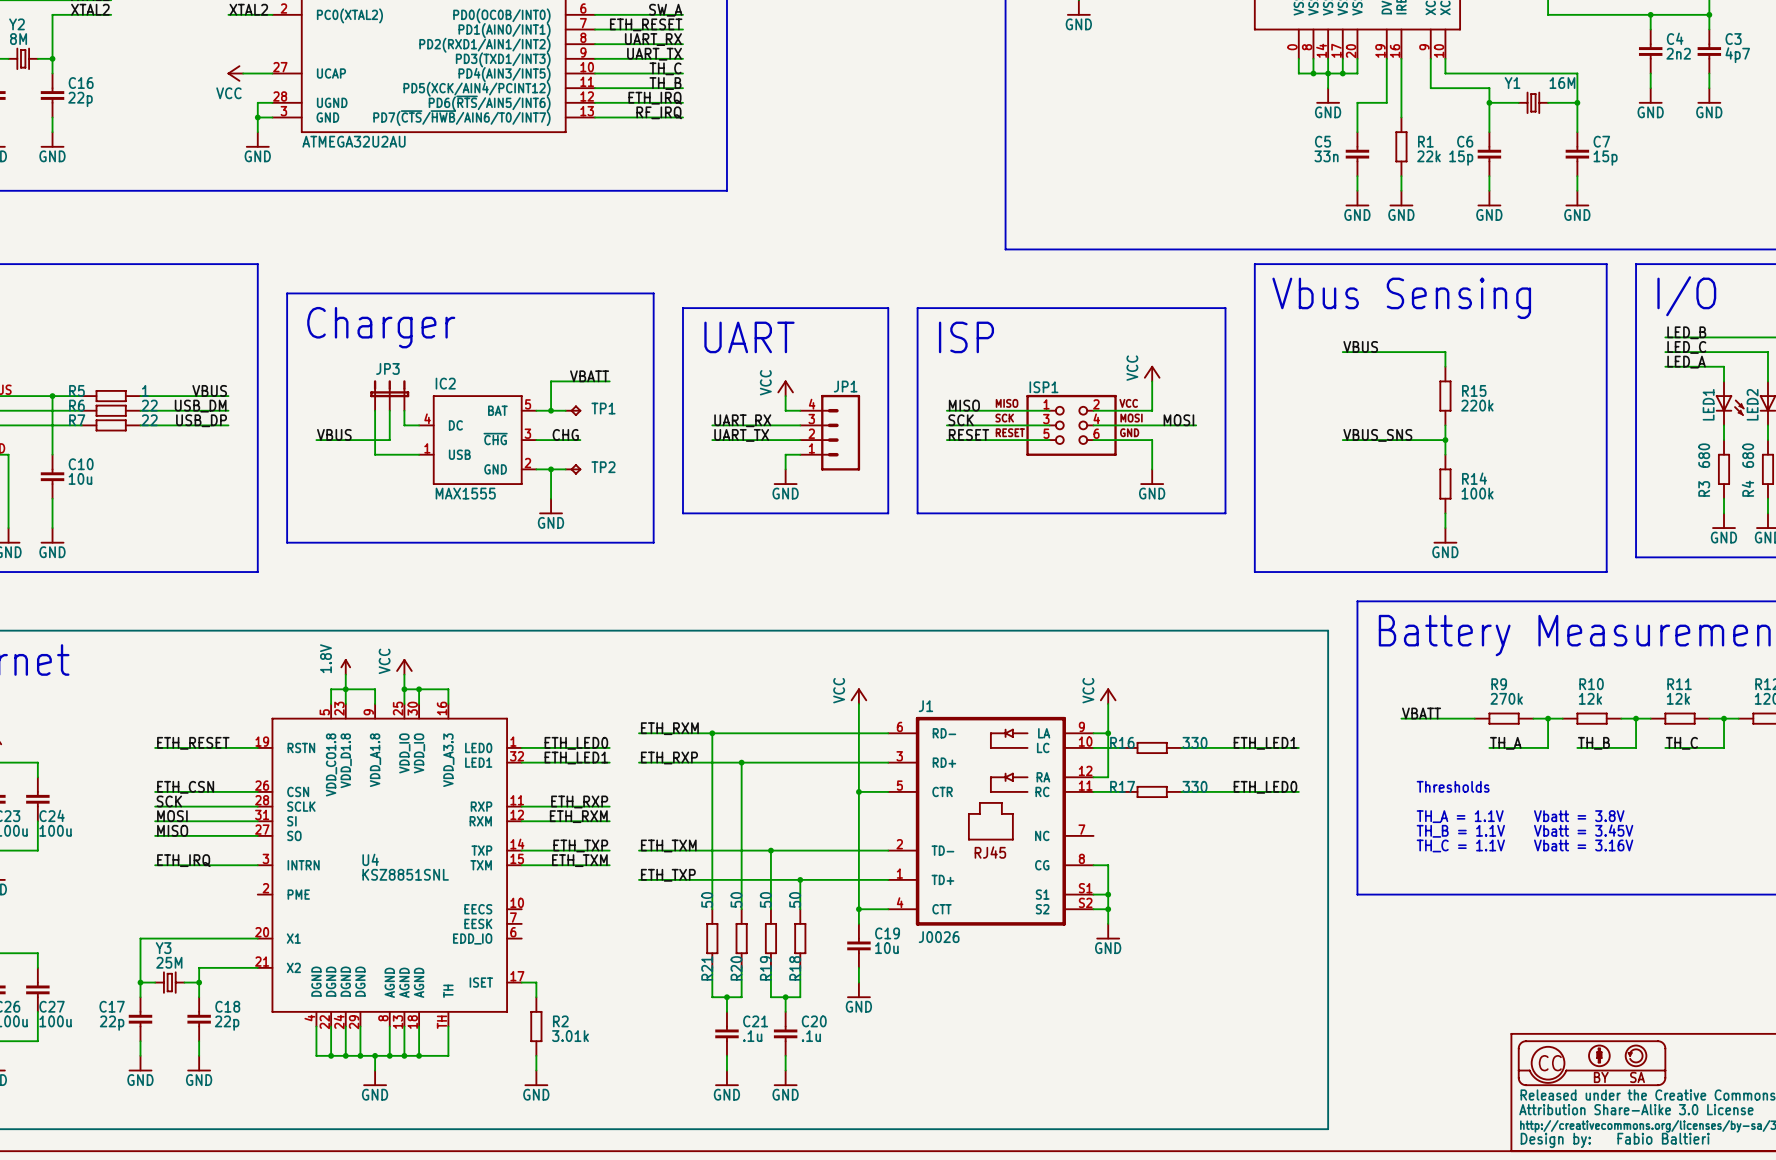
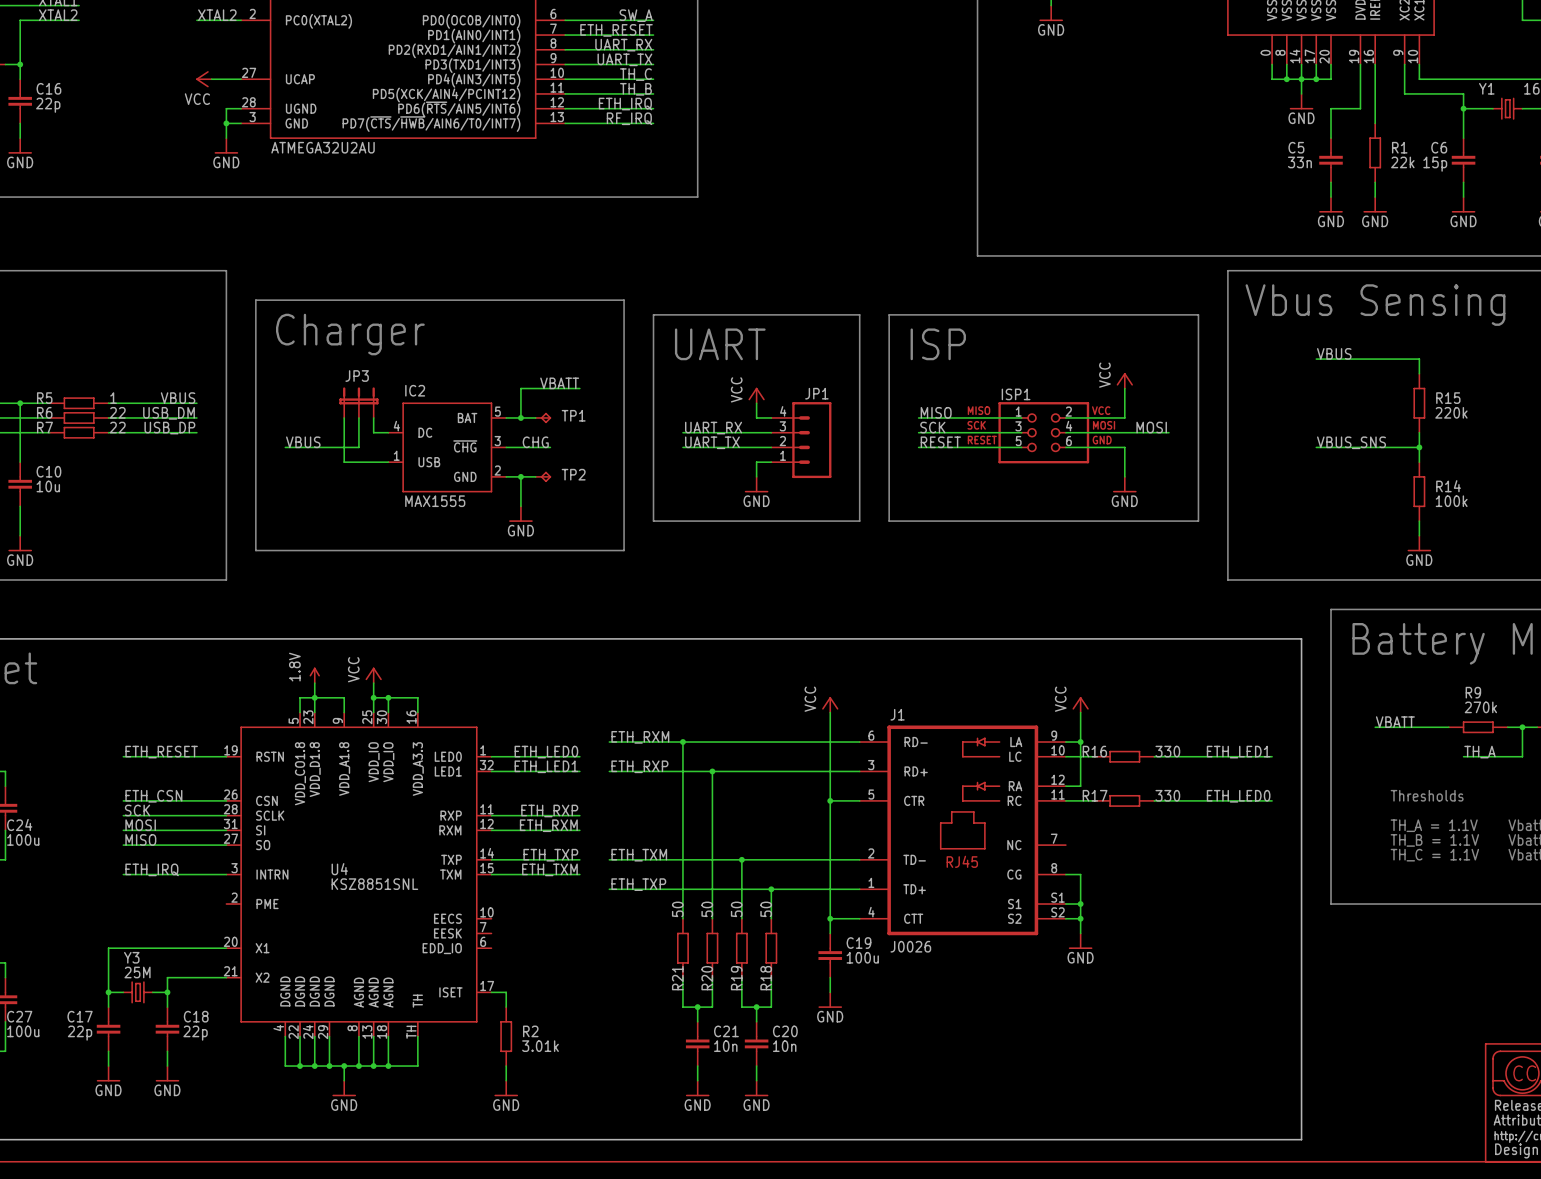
C19 value: 10u (886, 948) -> 100u (862, 957)
C21 value: .1u (752, 1036) -> 10n (725, 1046)
C20 value: .1u (811, 1036) -> 10n (784, 1046)

